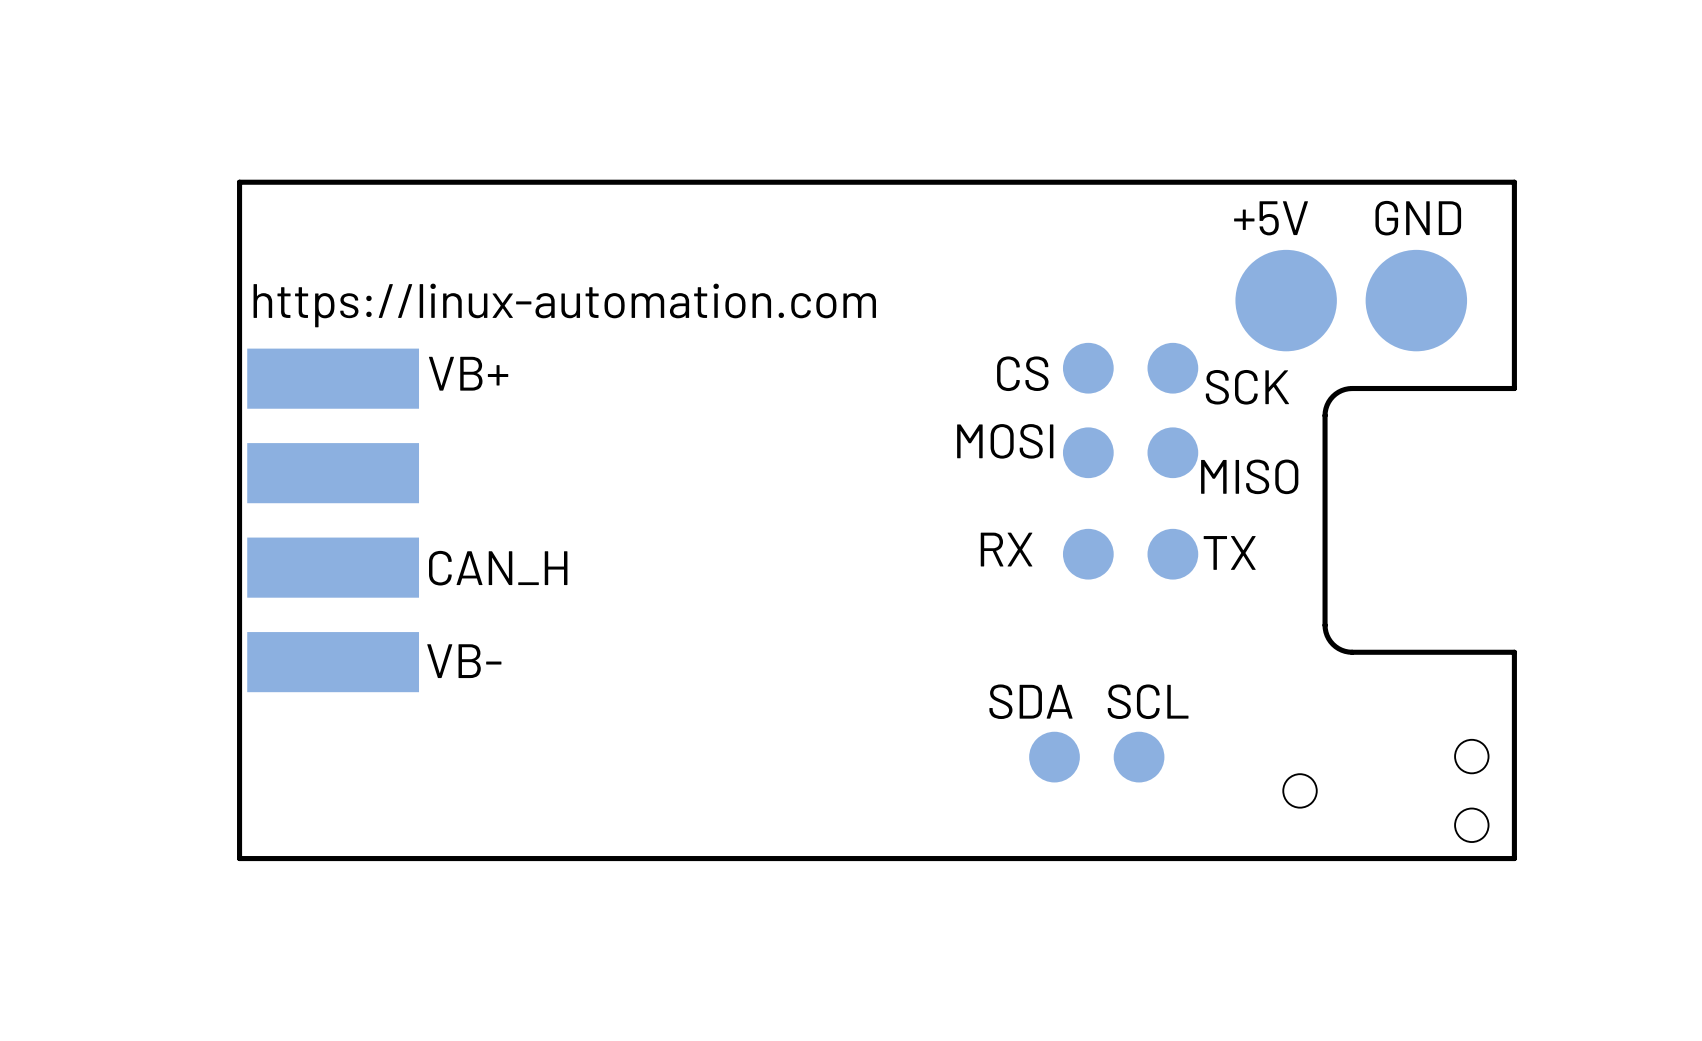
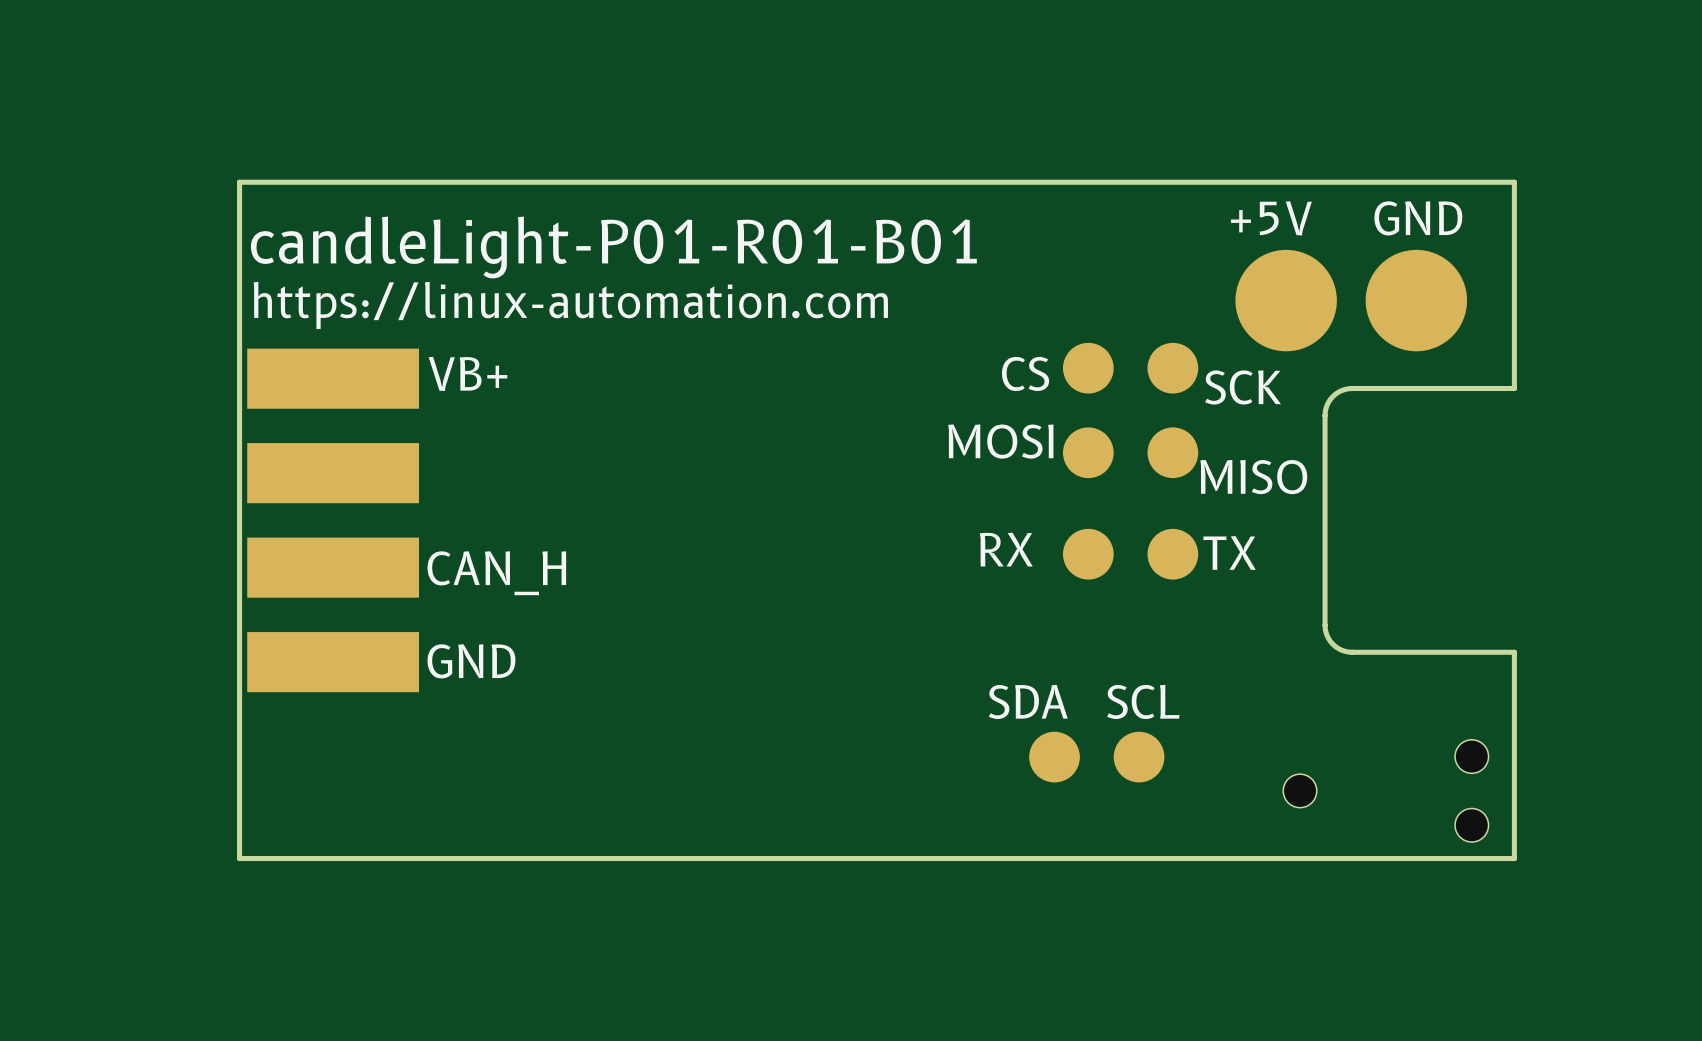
text: none -> candleLight-P01-R01-B01 (613, 247)
text: VB- (464, 661) -> GND (471, 661)

